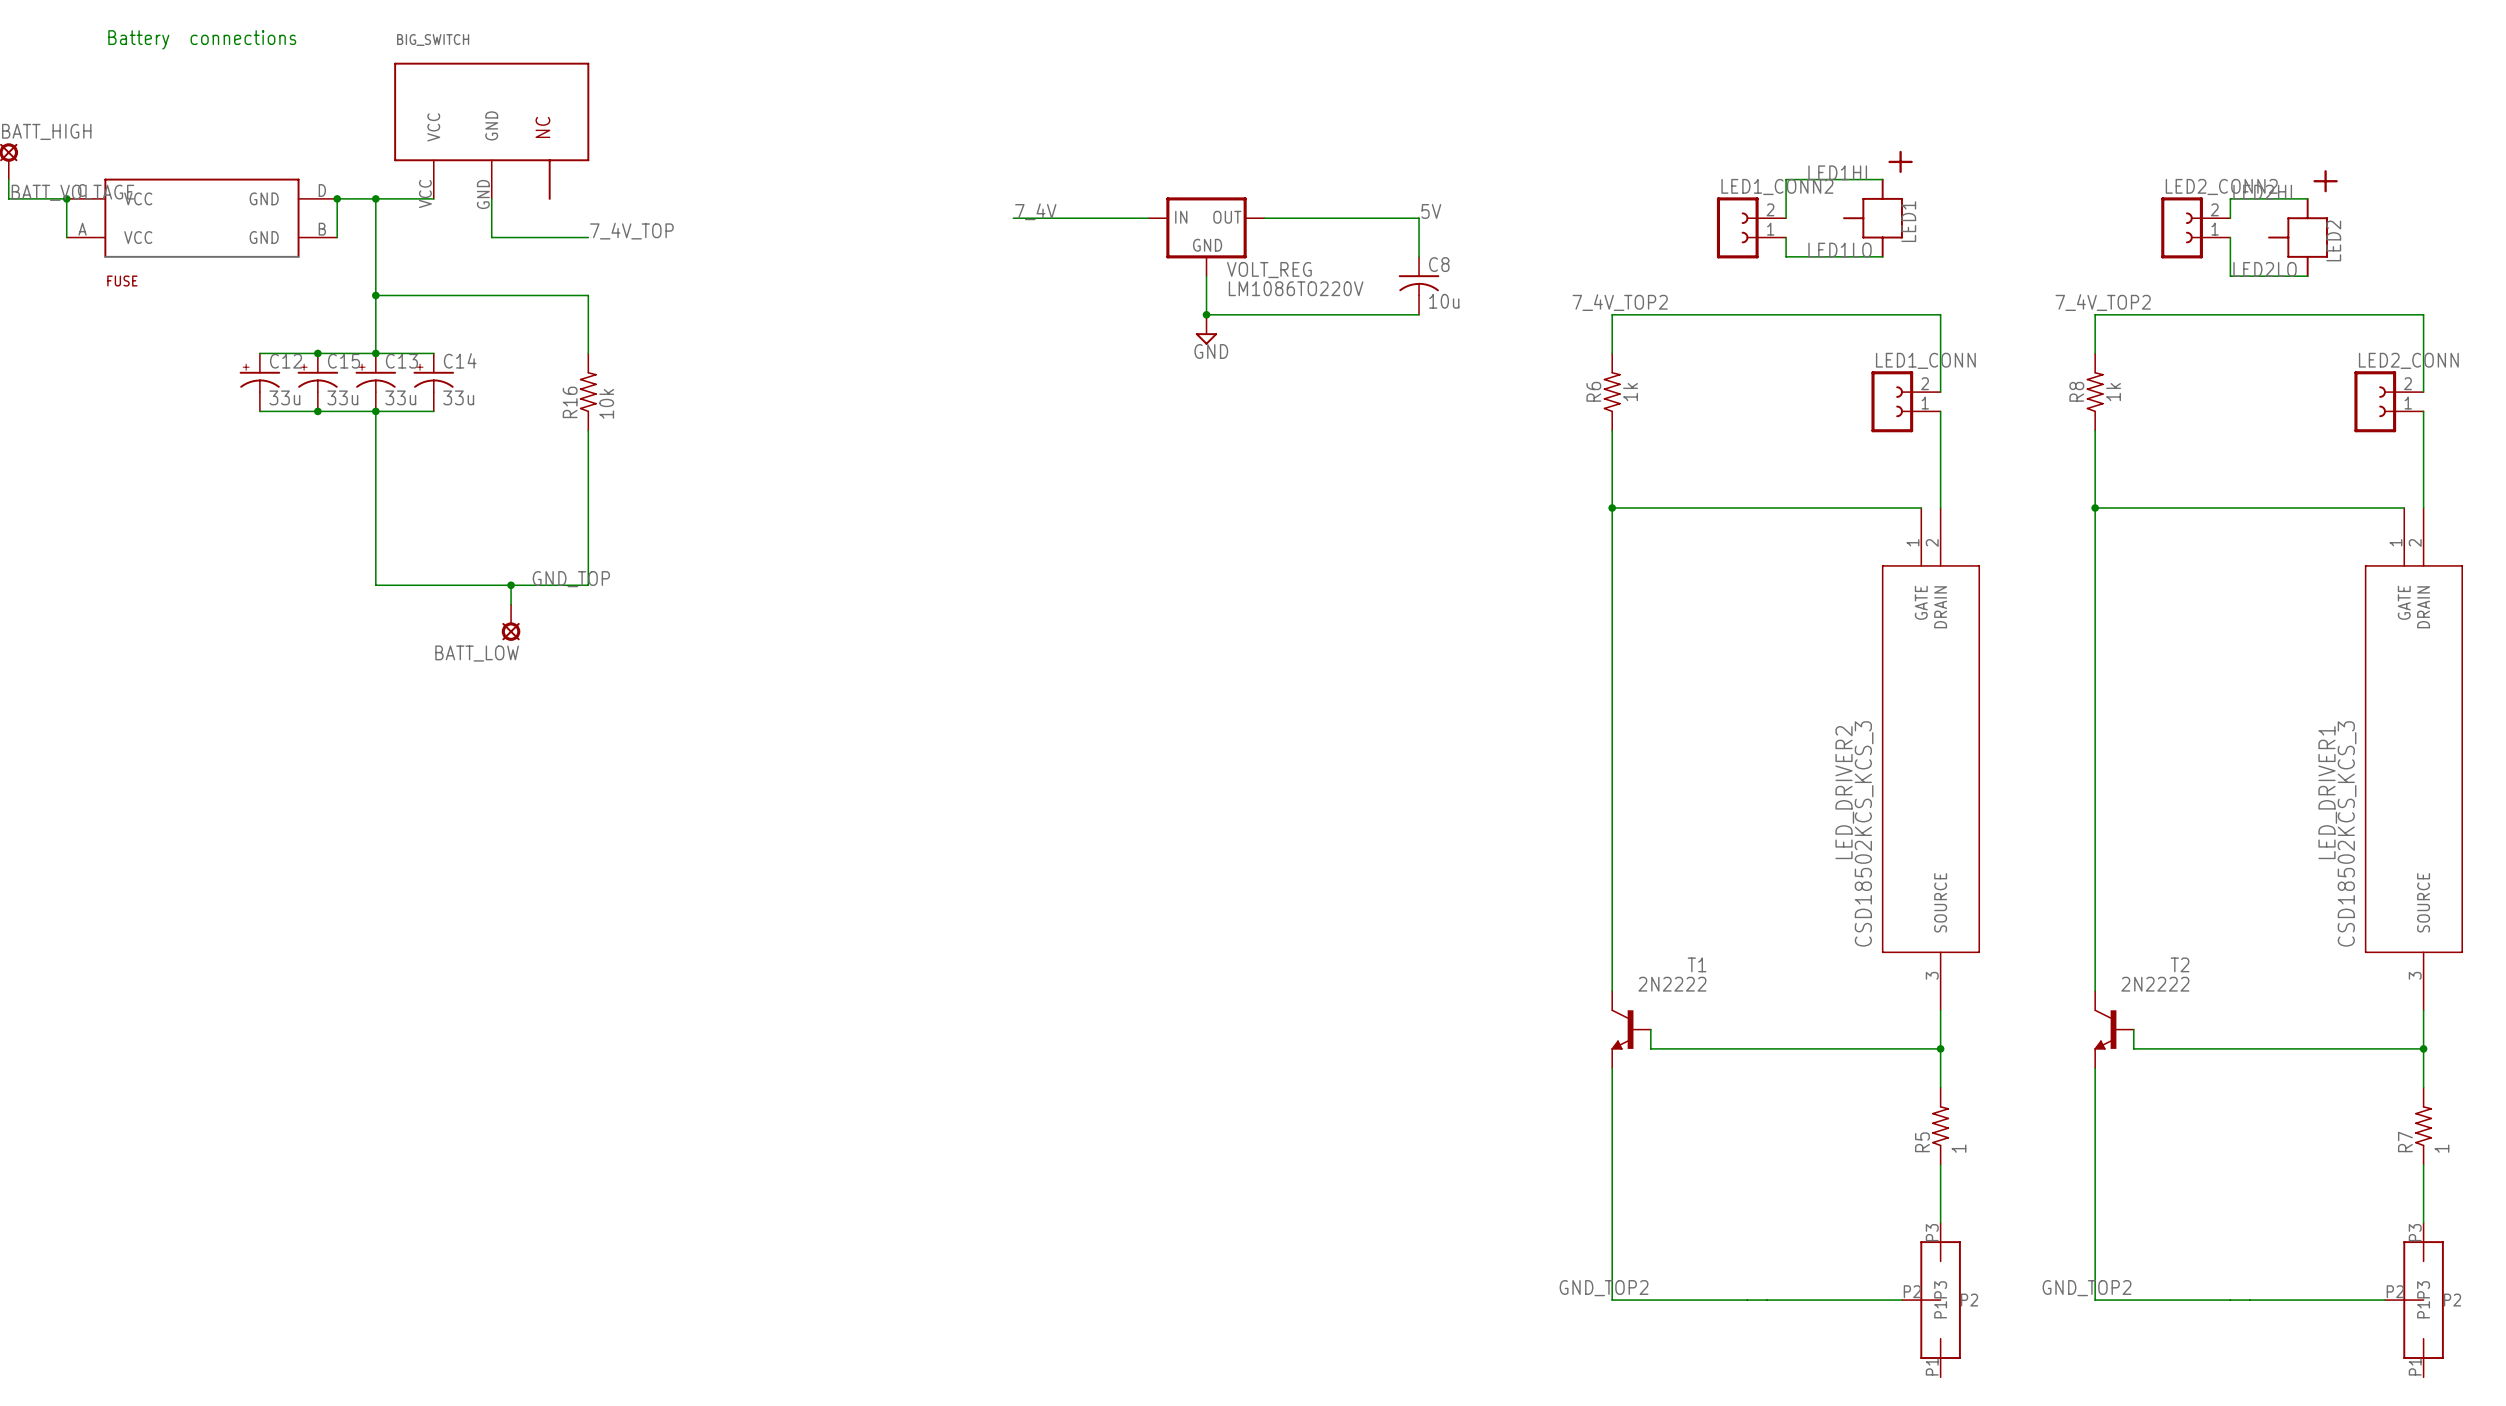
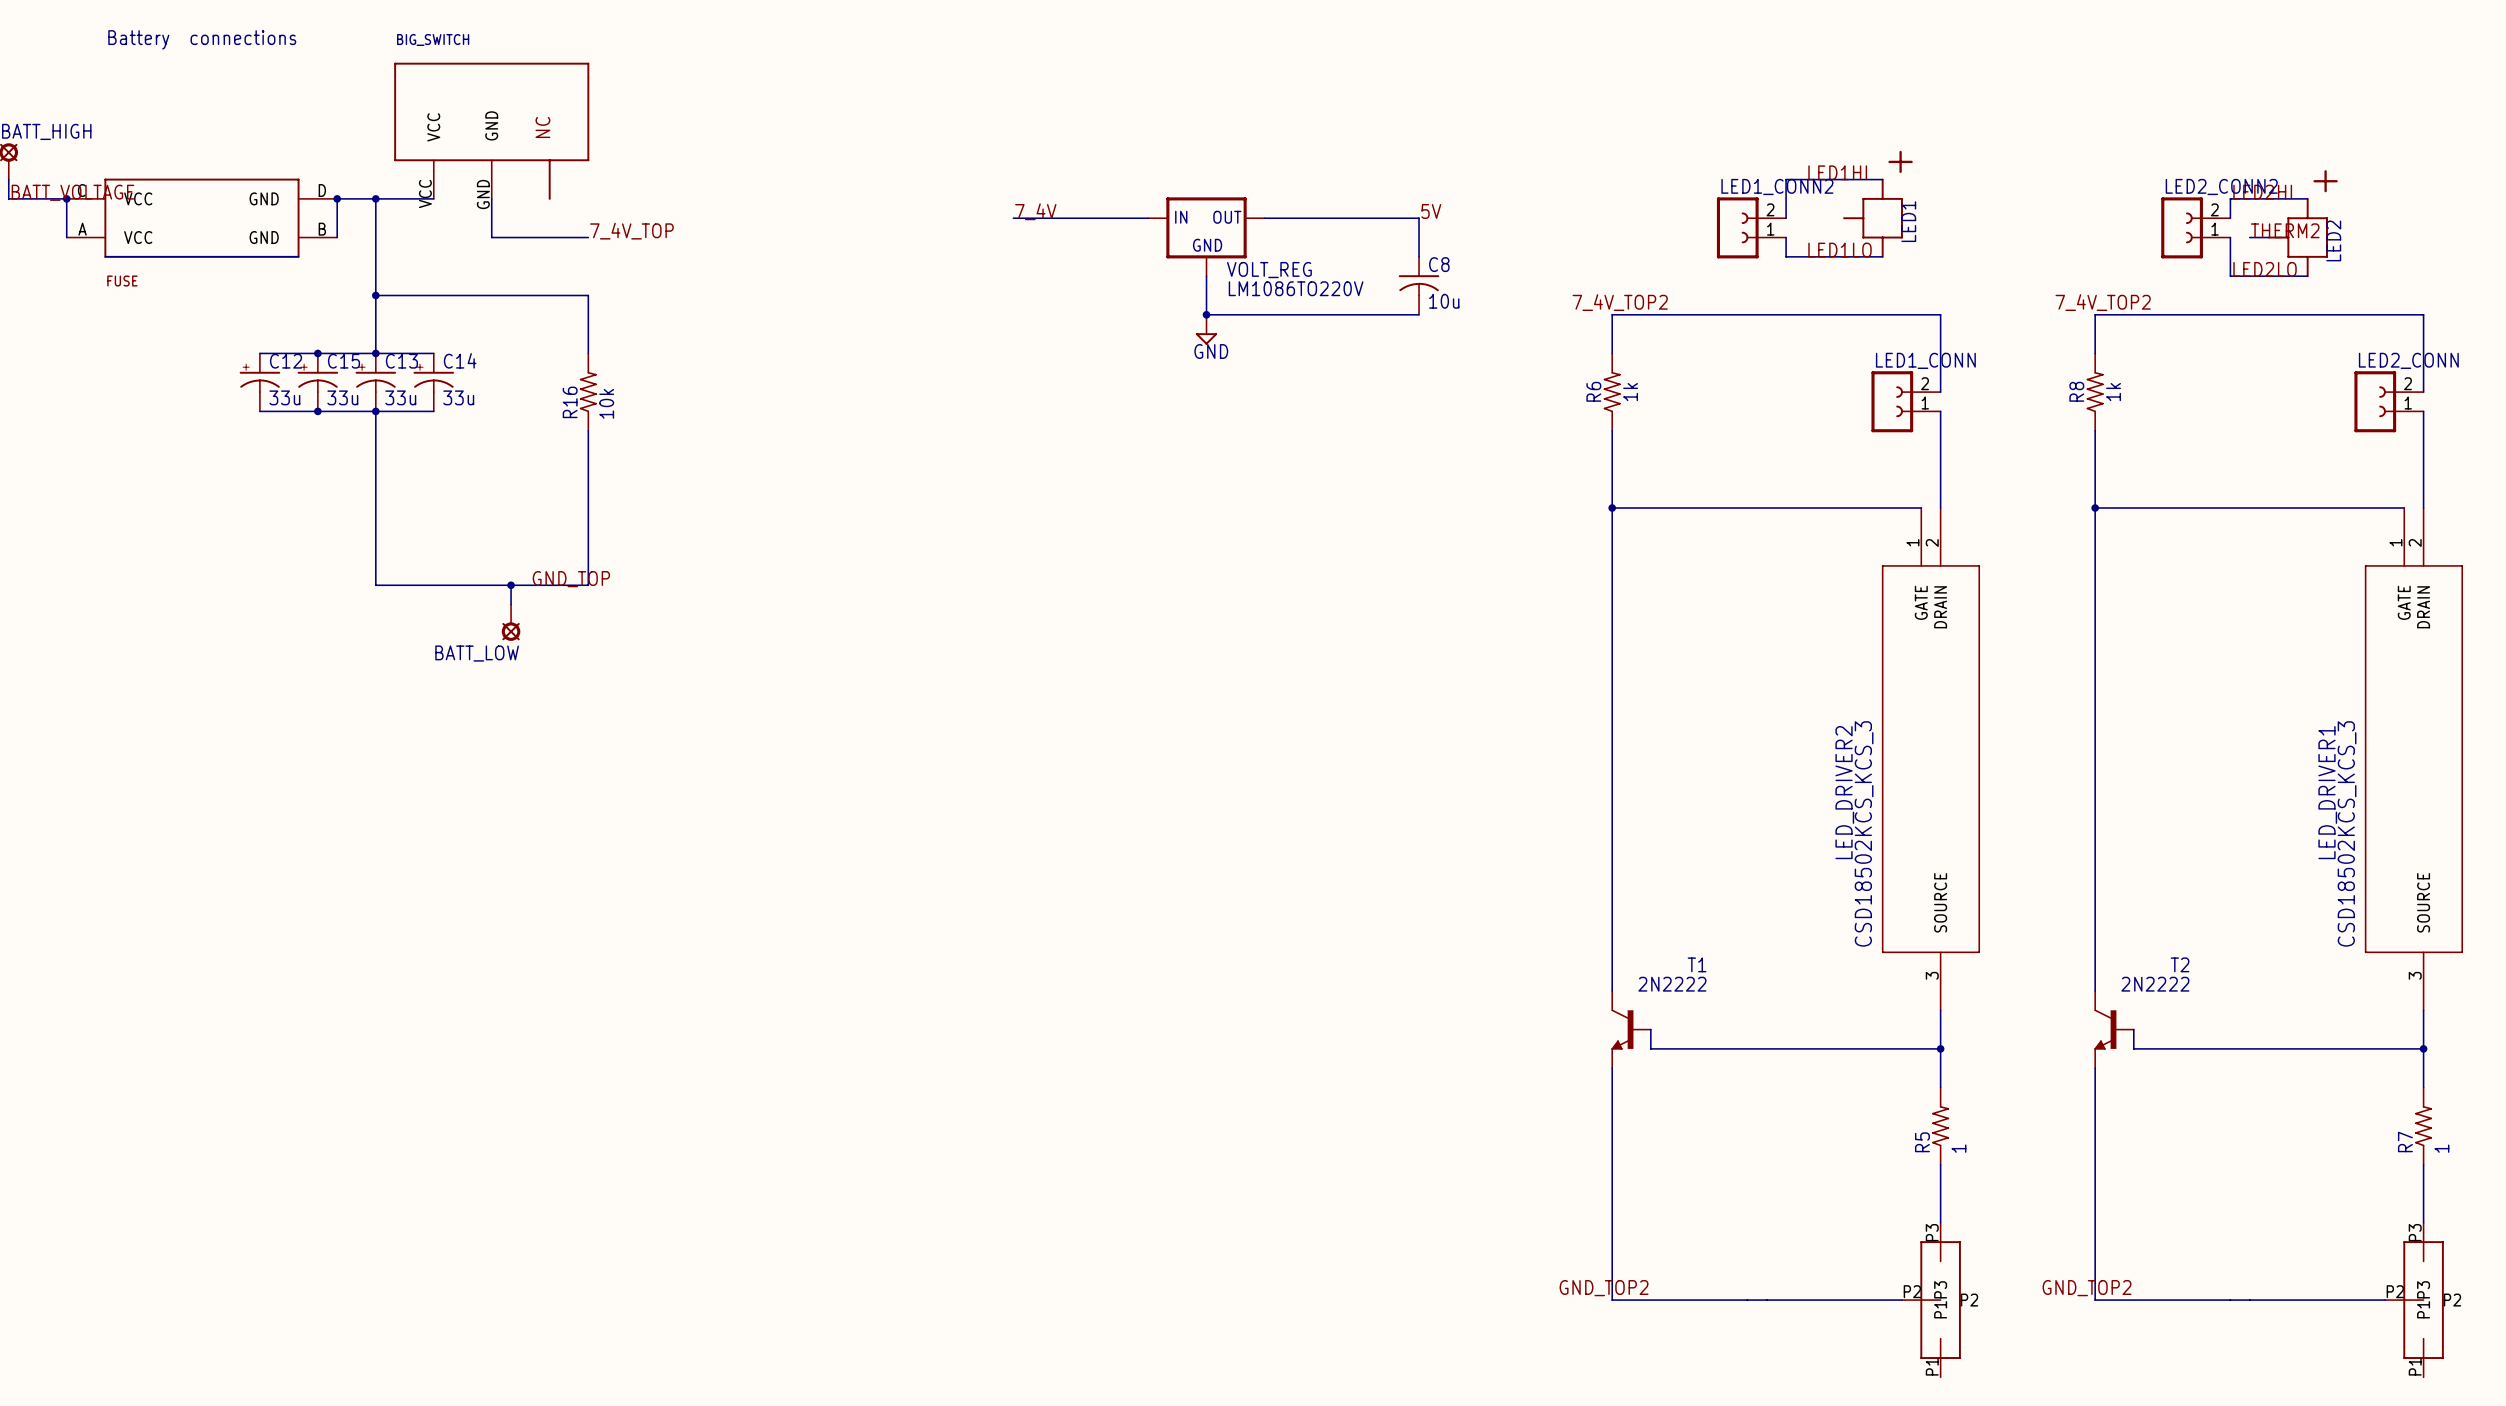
label: none -> THERM2 (2285, 230)
wire: none -> (2249, 237) (2269, 237)

